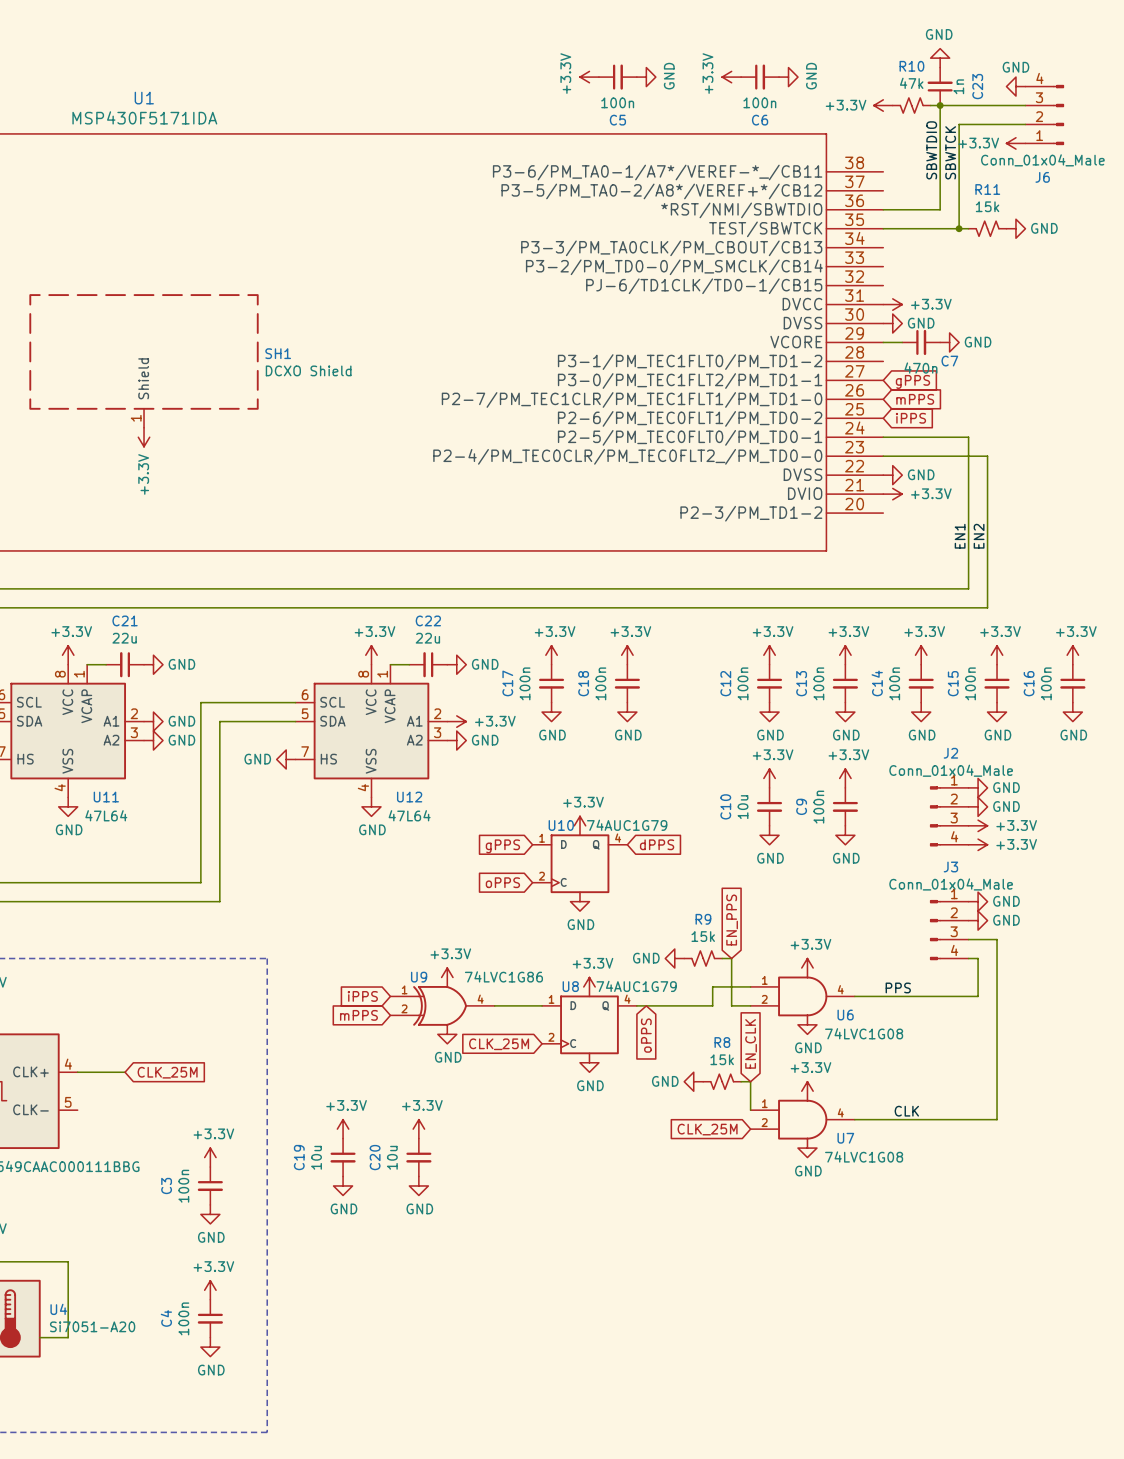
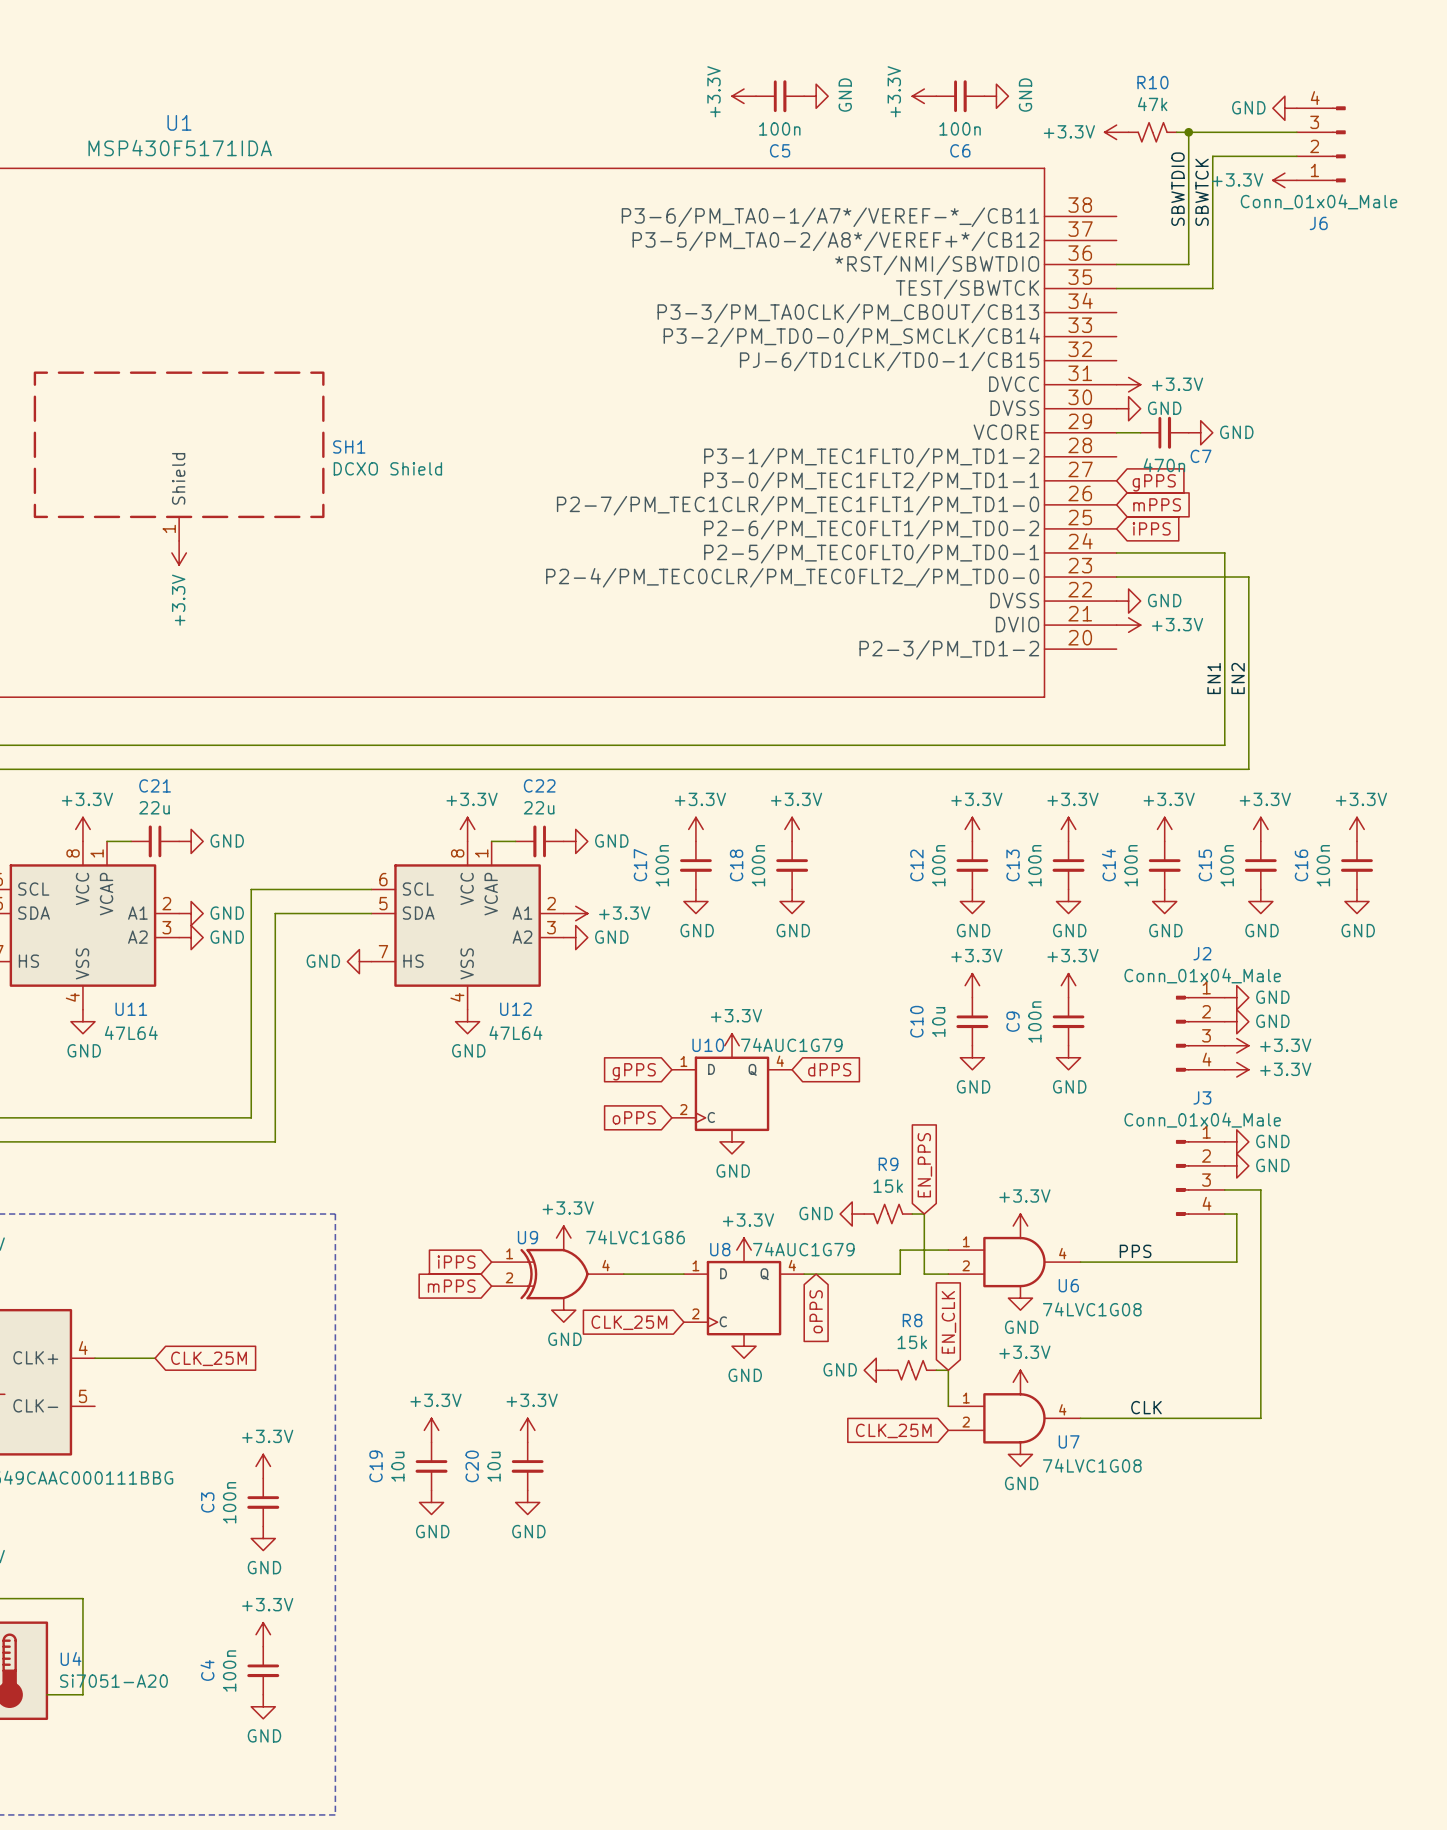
power symbol: GND (940, 58) -> none
power symbol text position: GND (1015, 67) -> GND (1248, 107)
C23: 1n (940, 86) -> none
wire: (959, 228) (968, 228) -> none
junction: (959, 228) -> none
R11: 15k (987, 228) -> none
power symbol: GND (1015, 228) -> none

